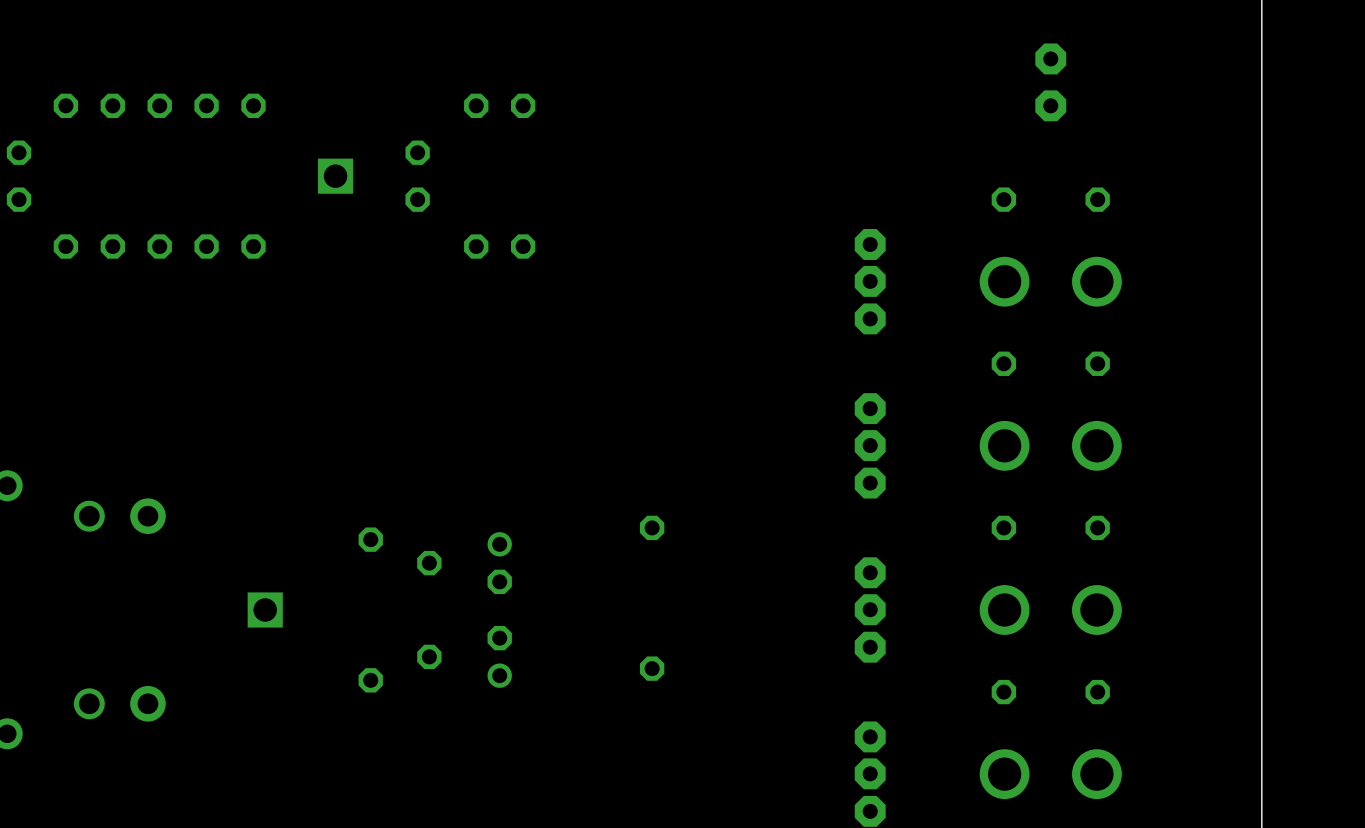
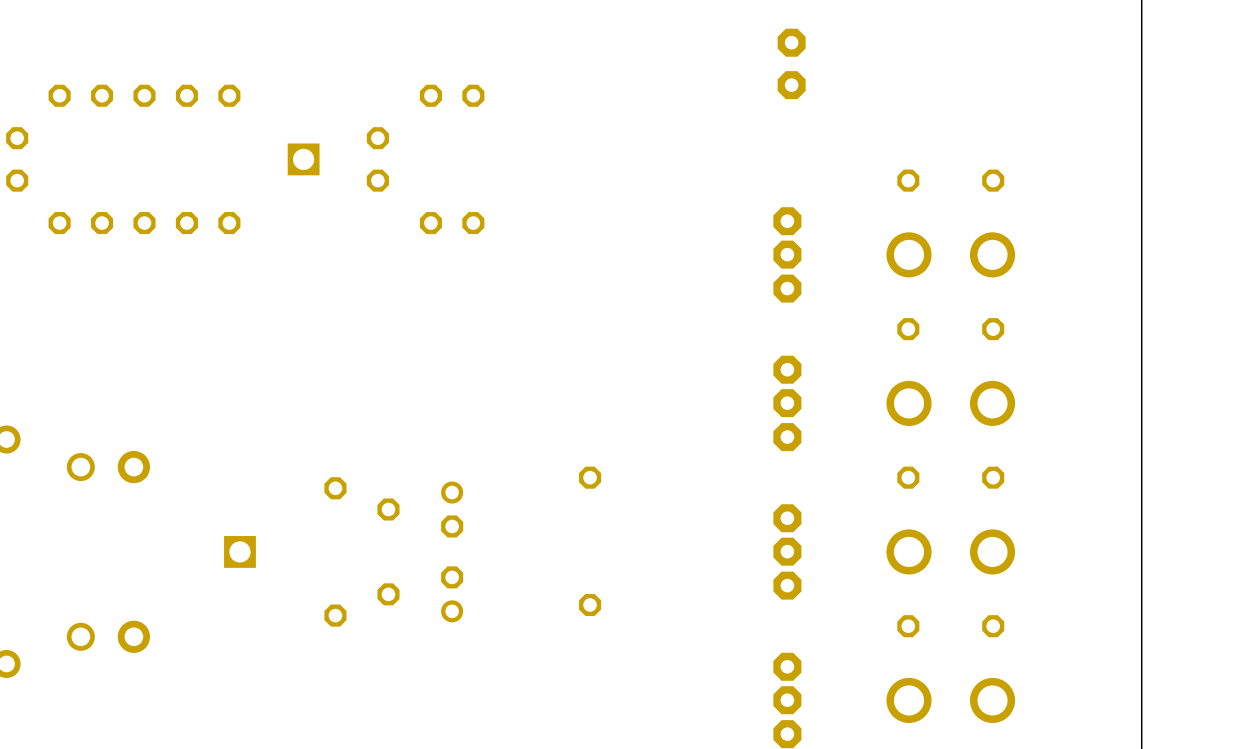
part position: (1050, 82) -> (791, 63)

